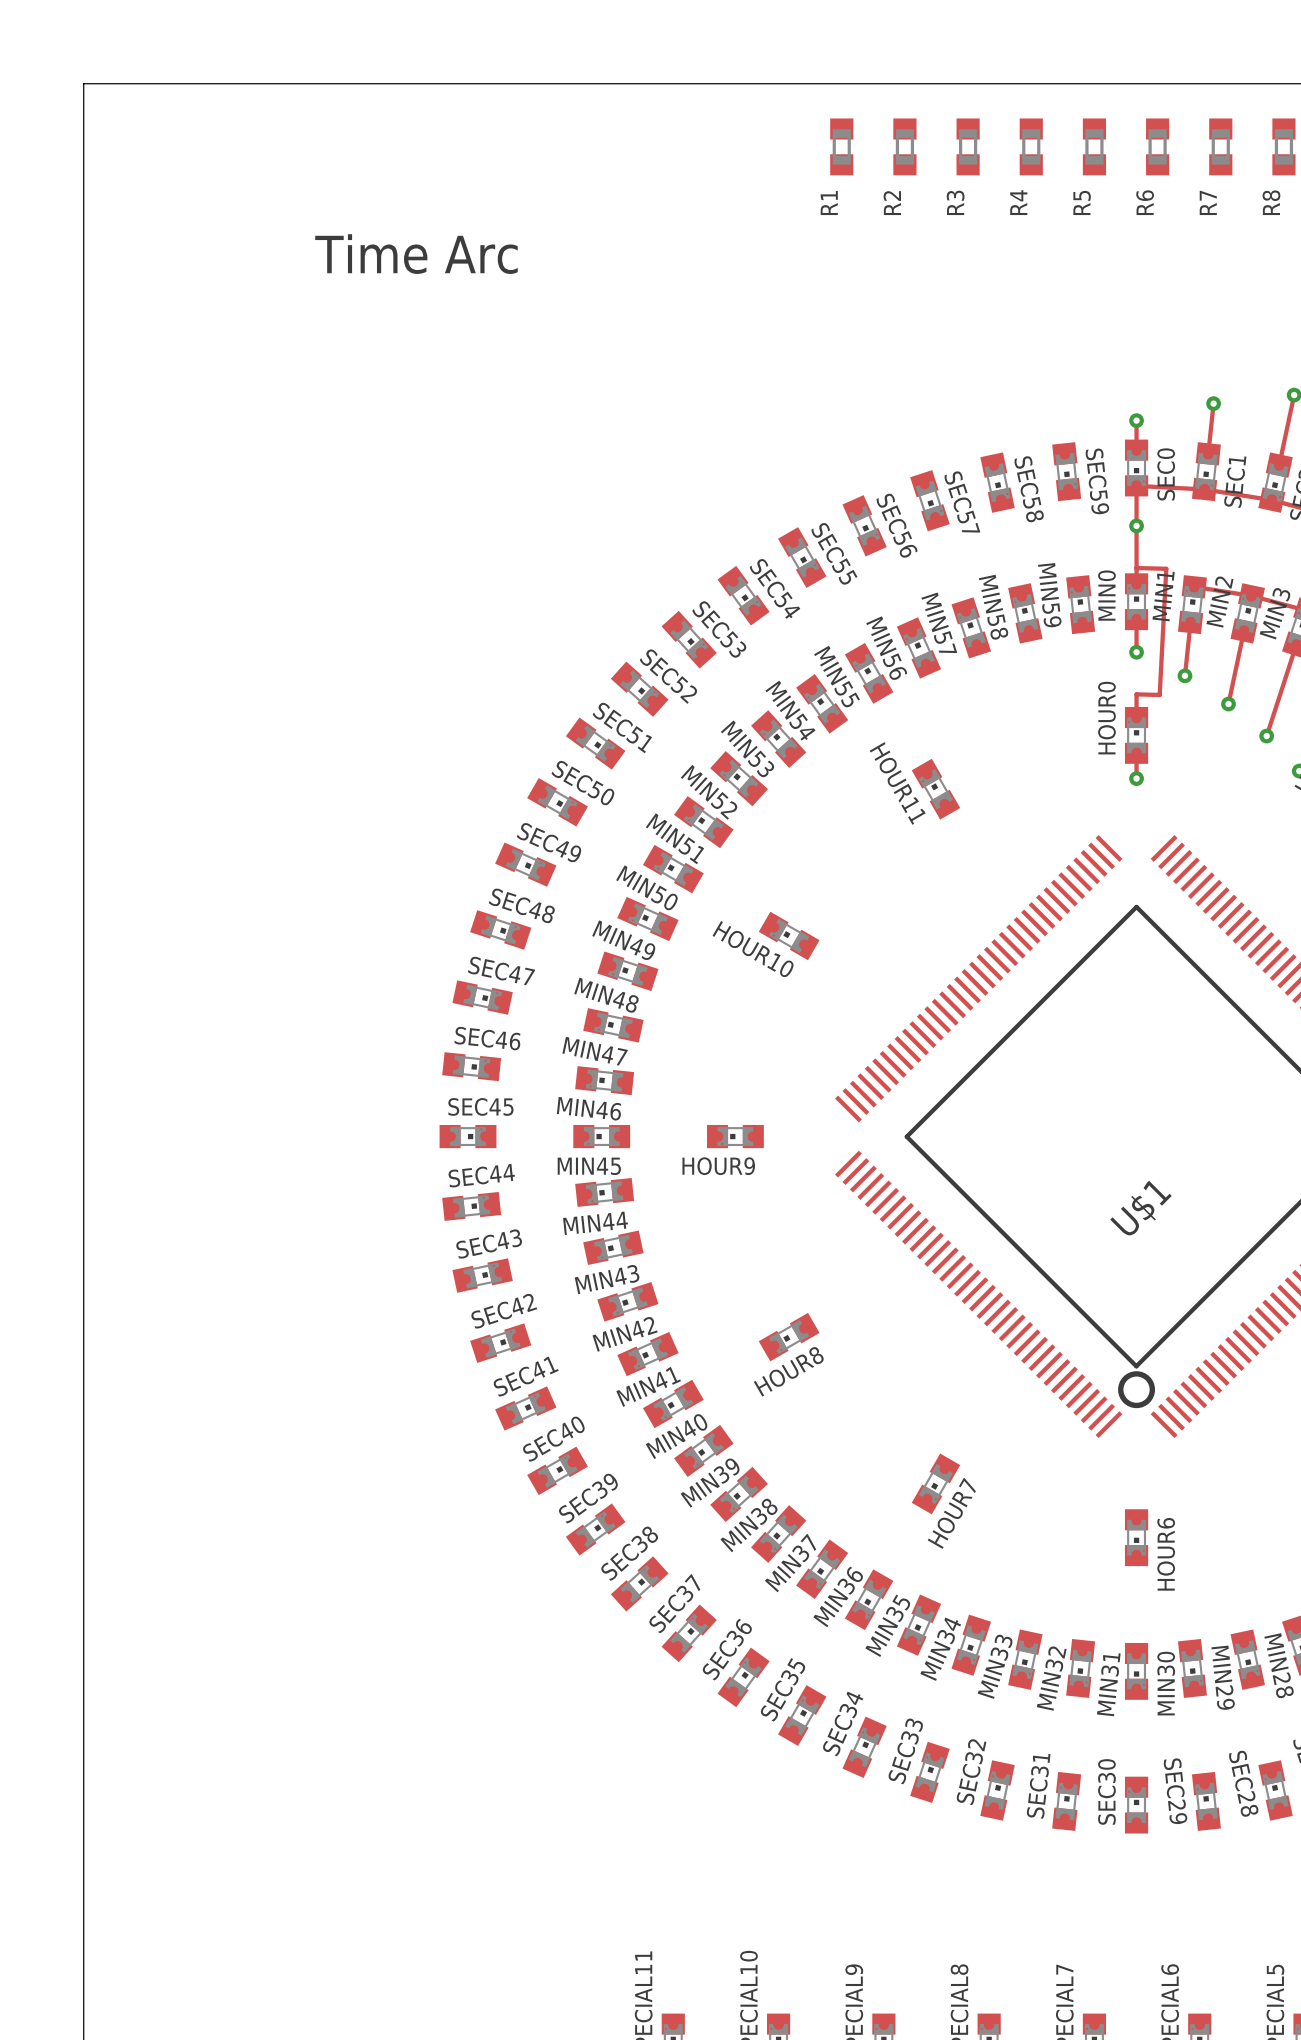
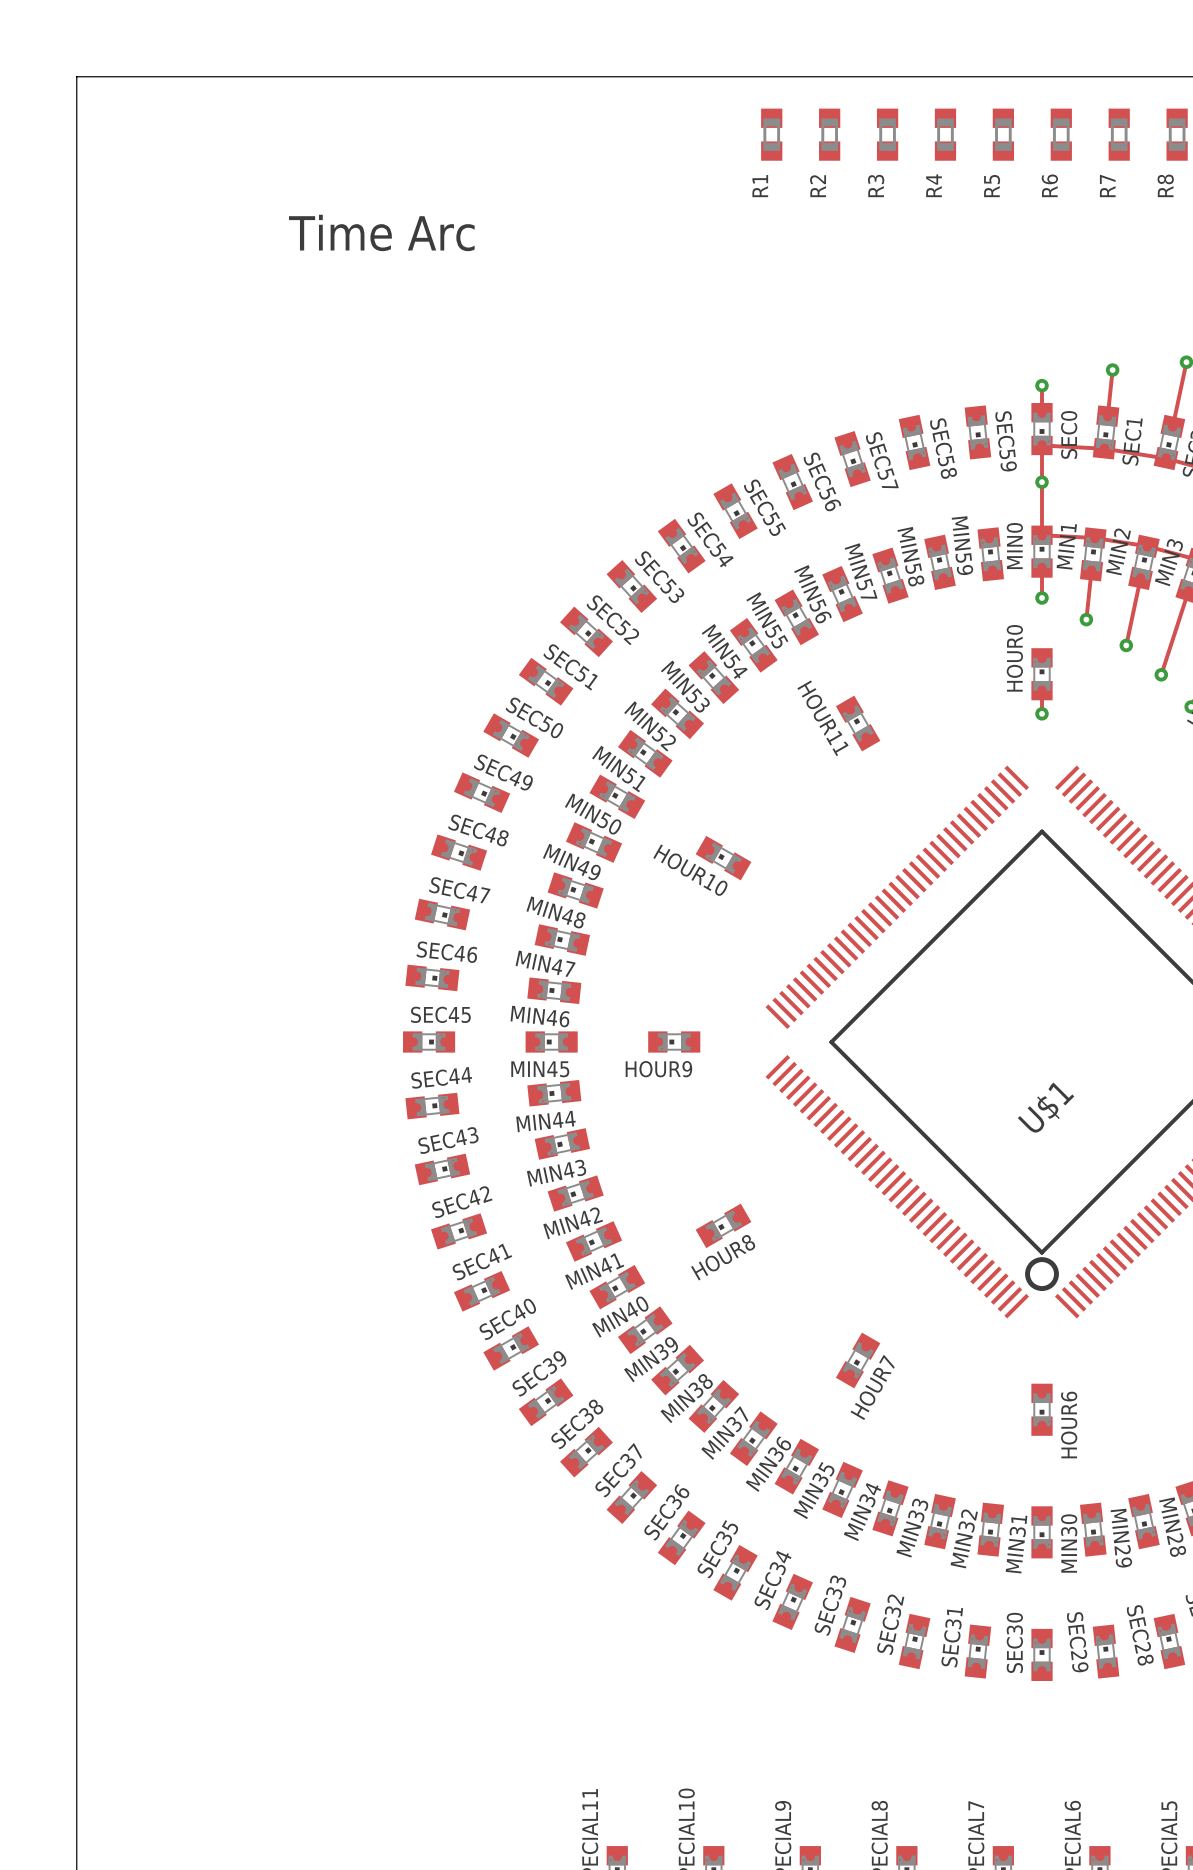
track: (1136, 568) (1166, 568) (1159, 694) (1136, 694) (1136, 717) -> none
track: none -> (1042, 535) (1094, 538)

